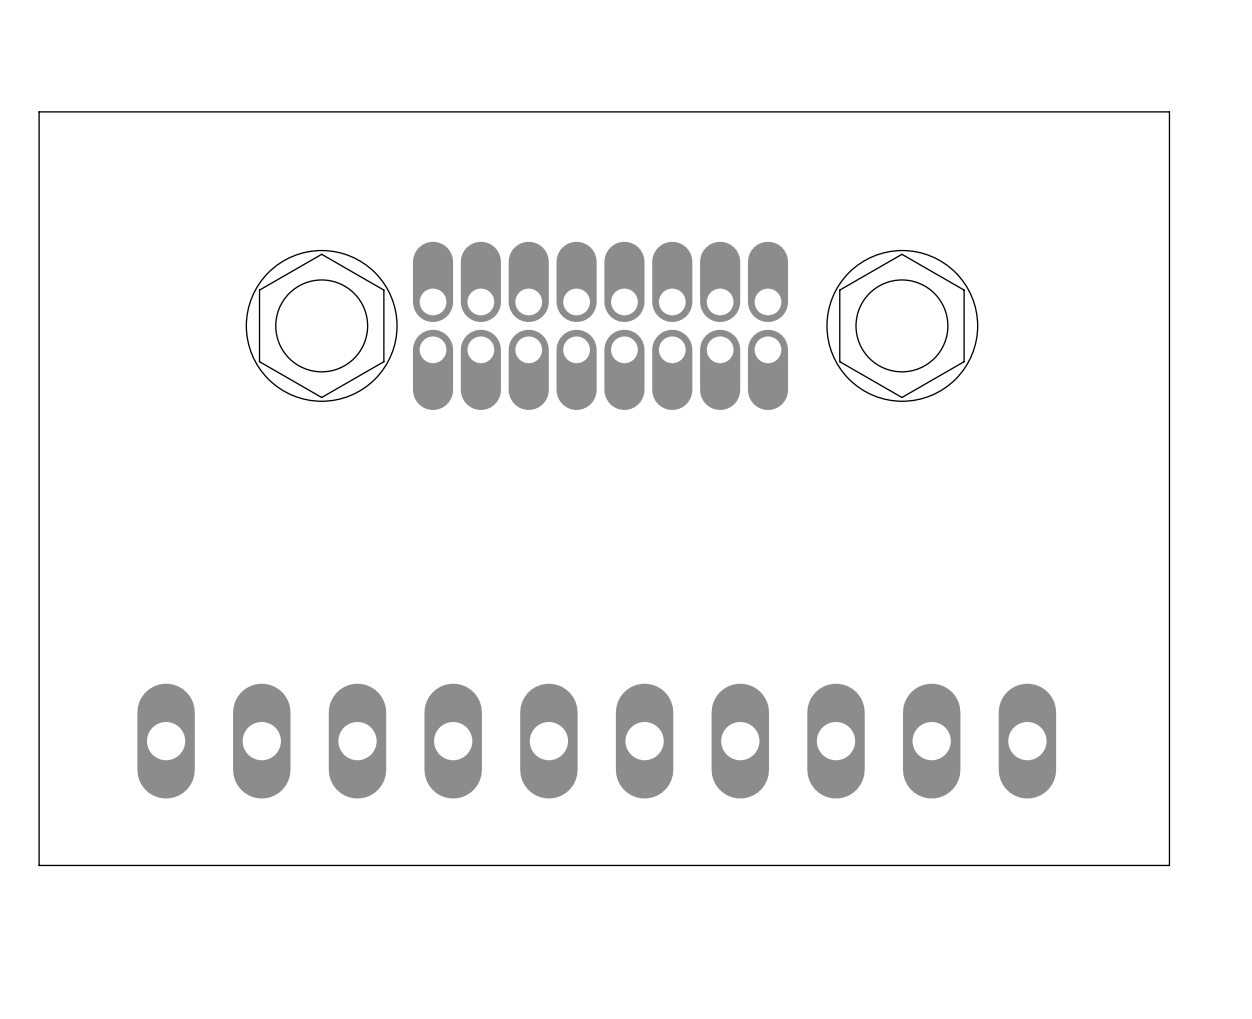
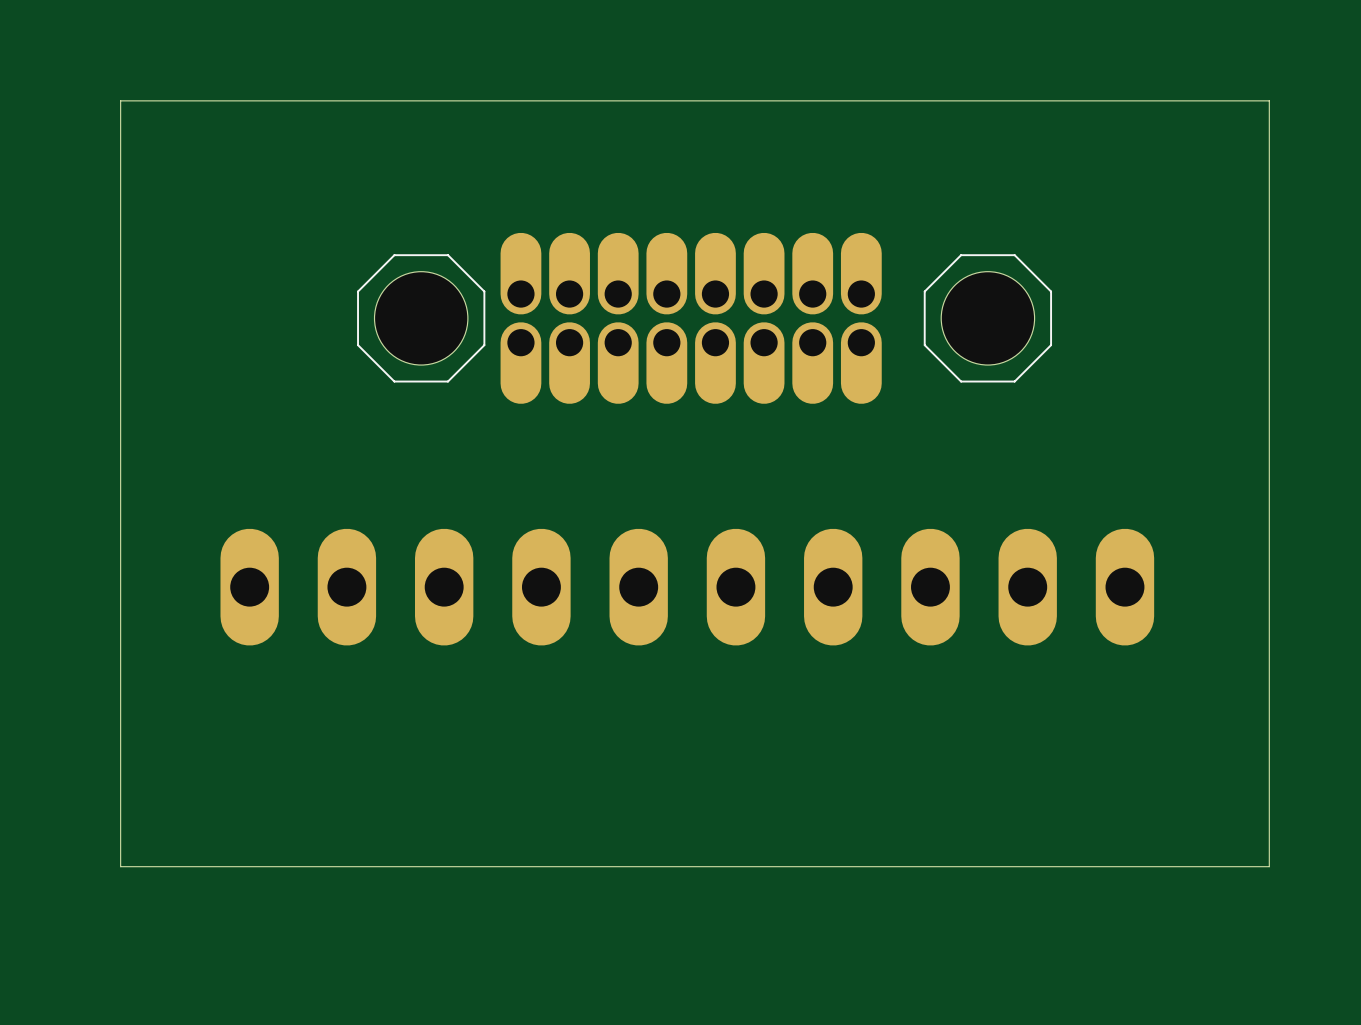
part footprint: [246, 241, 978, 411] -> [357, 232, 1053, 404]
part position: (596, 741) -> (687, 587)

